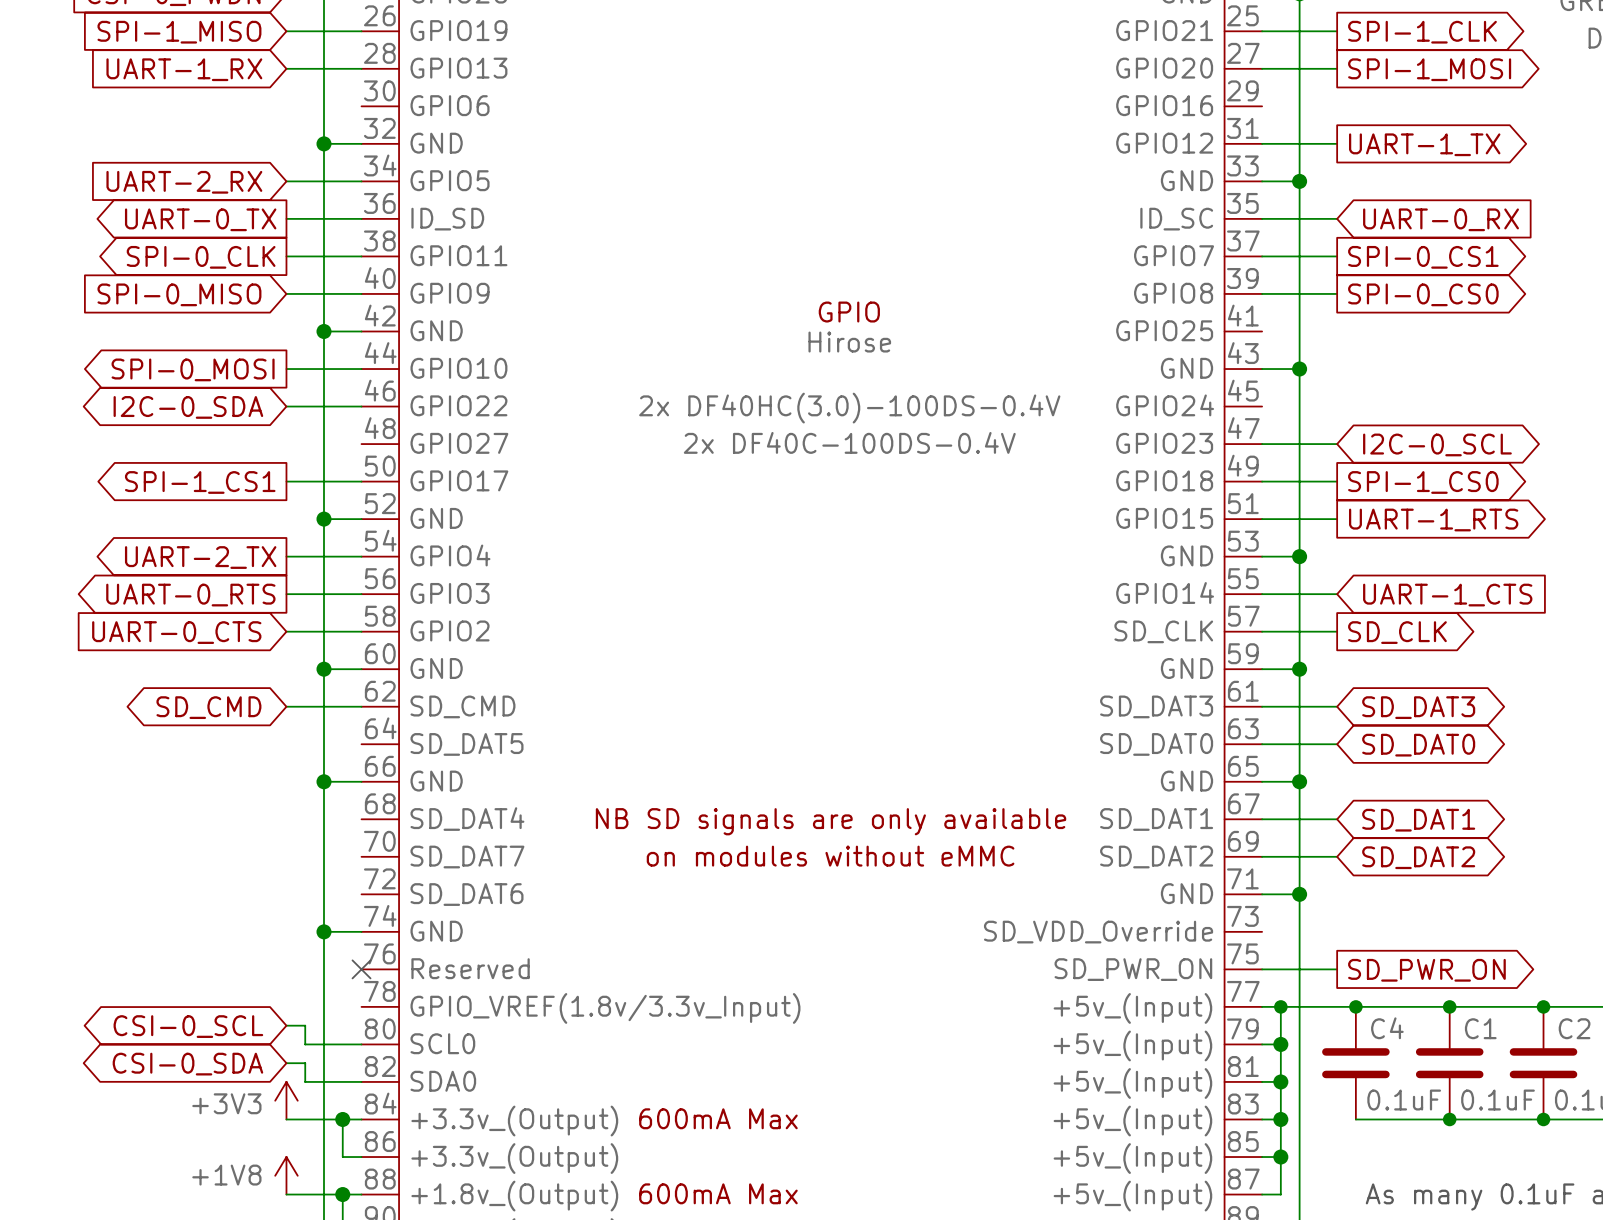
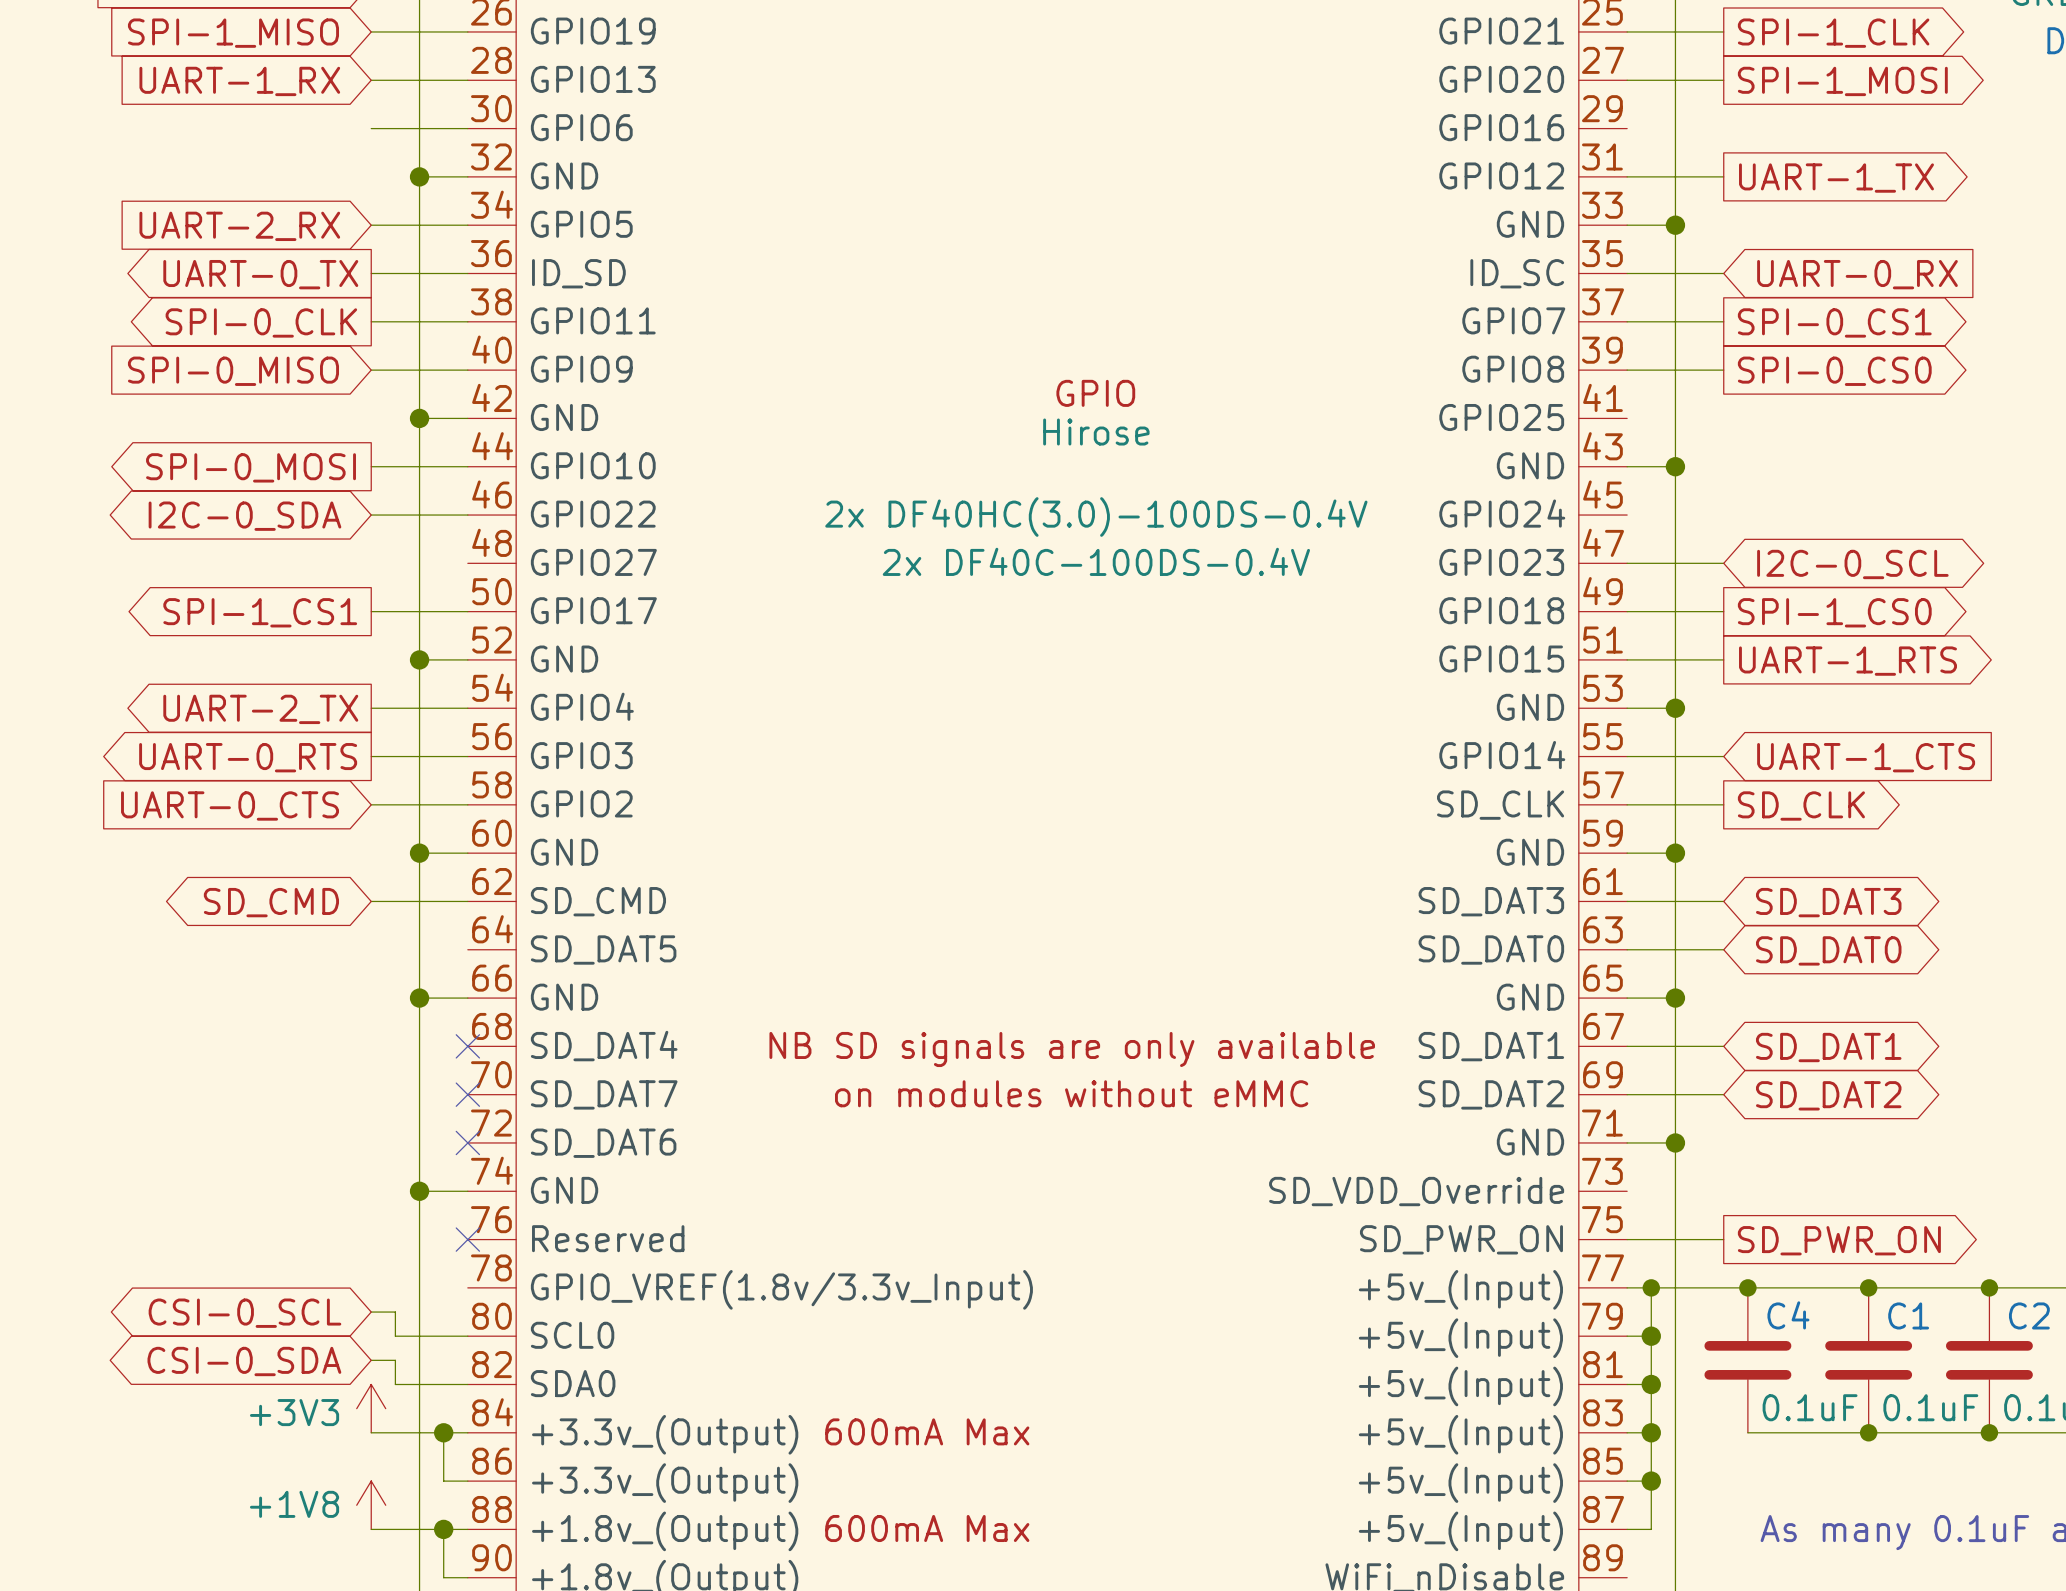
wire: none -> (371, 128) (467, 128)
no-connect mark: none -> (467, 1046)
no-connect mark: none -> (467, 1094)
no-connect mark: none -> (467, 1142)

